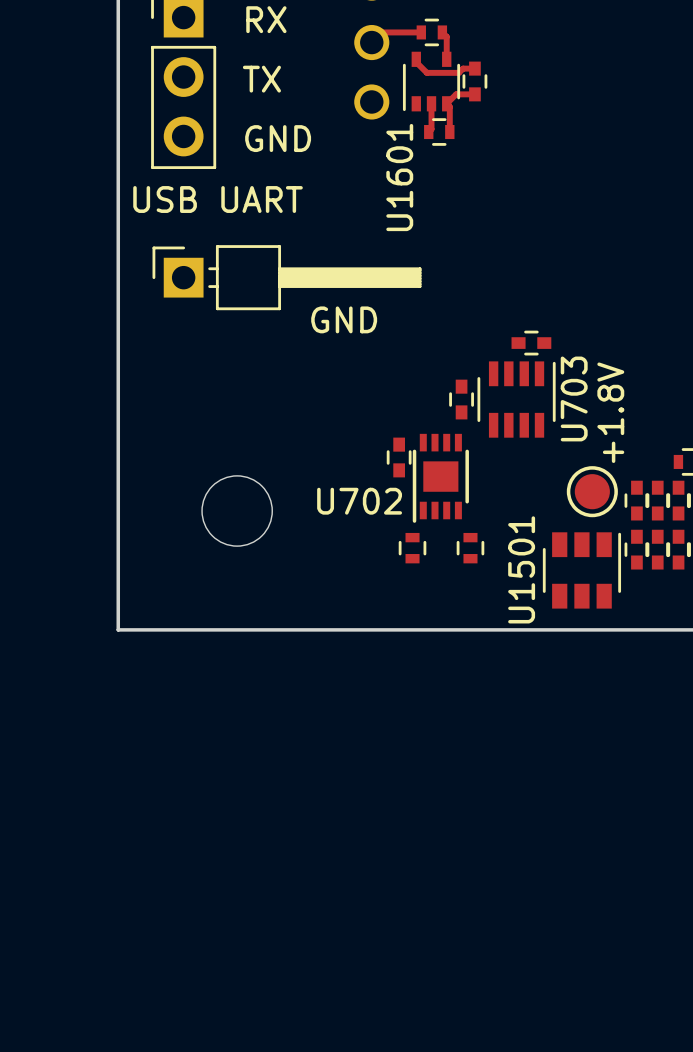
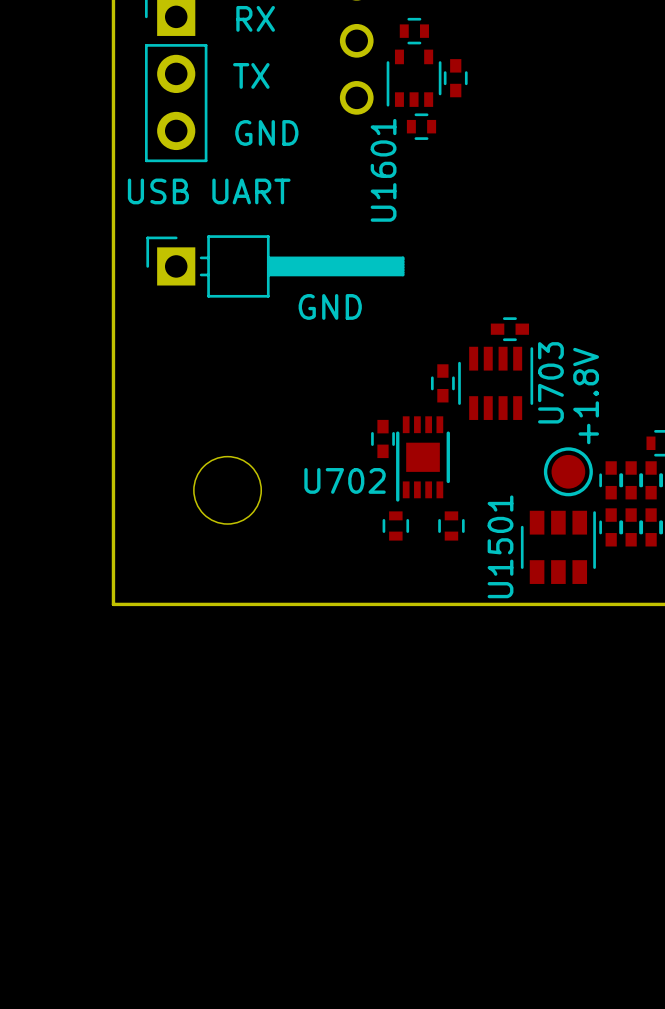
track: (421, 32) (381, 32) (371, 42) -> none
track: (442, 32) (446, 36) (446, 59) -> none
track: (416, 59) (416, 62) (426, 72) (458, 72) (463, 68) (474, 68) -> none
track: (474, 94) (456, 94) (446, 103) (449, 106) (449, 132) -> none
track: (431, 103) (431, 129) (428, 132) -> none

